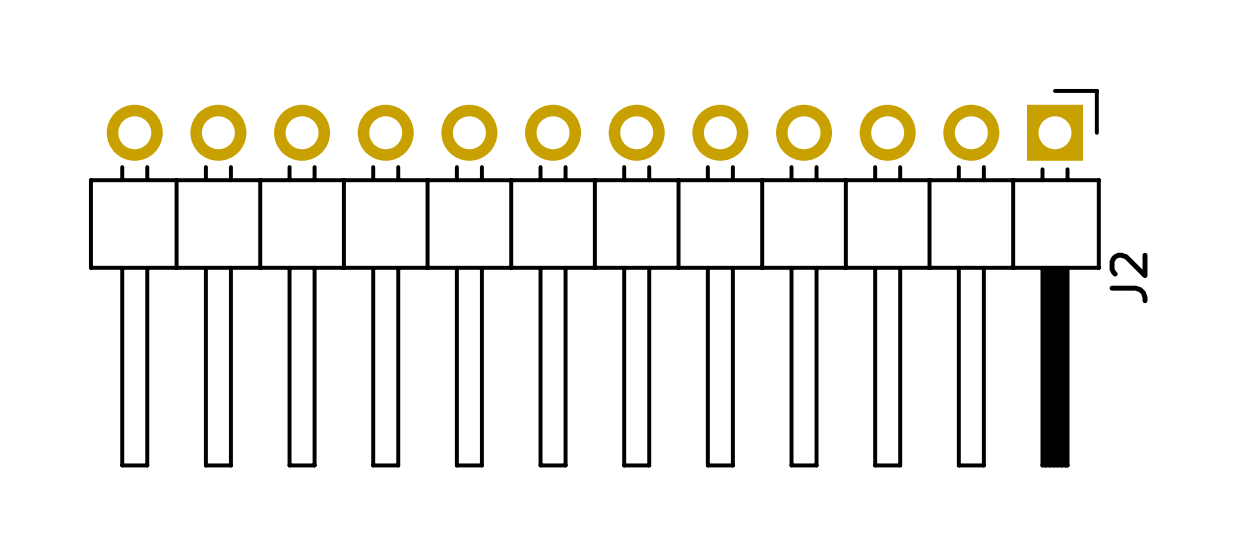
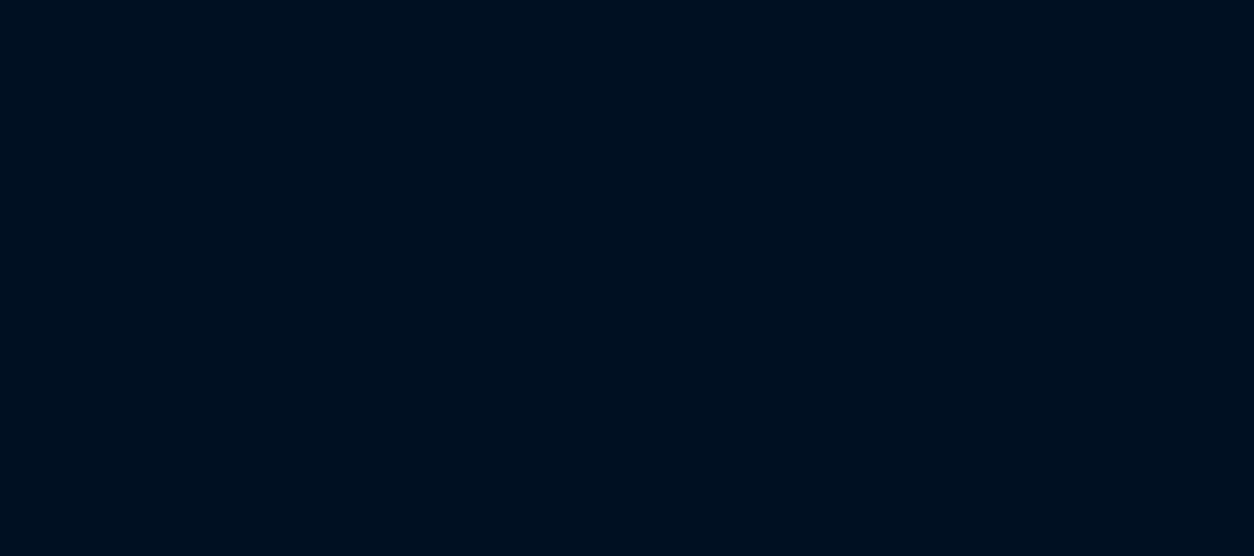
J2: (594, 278) -> none

